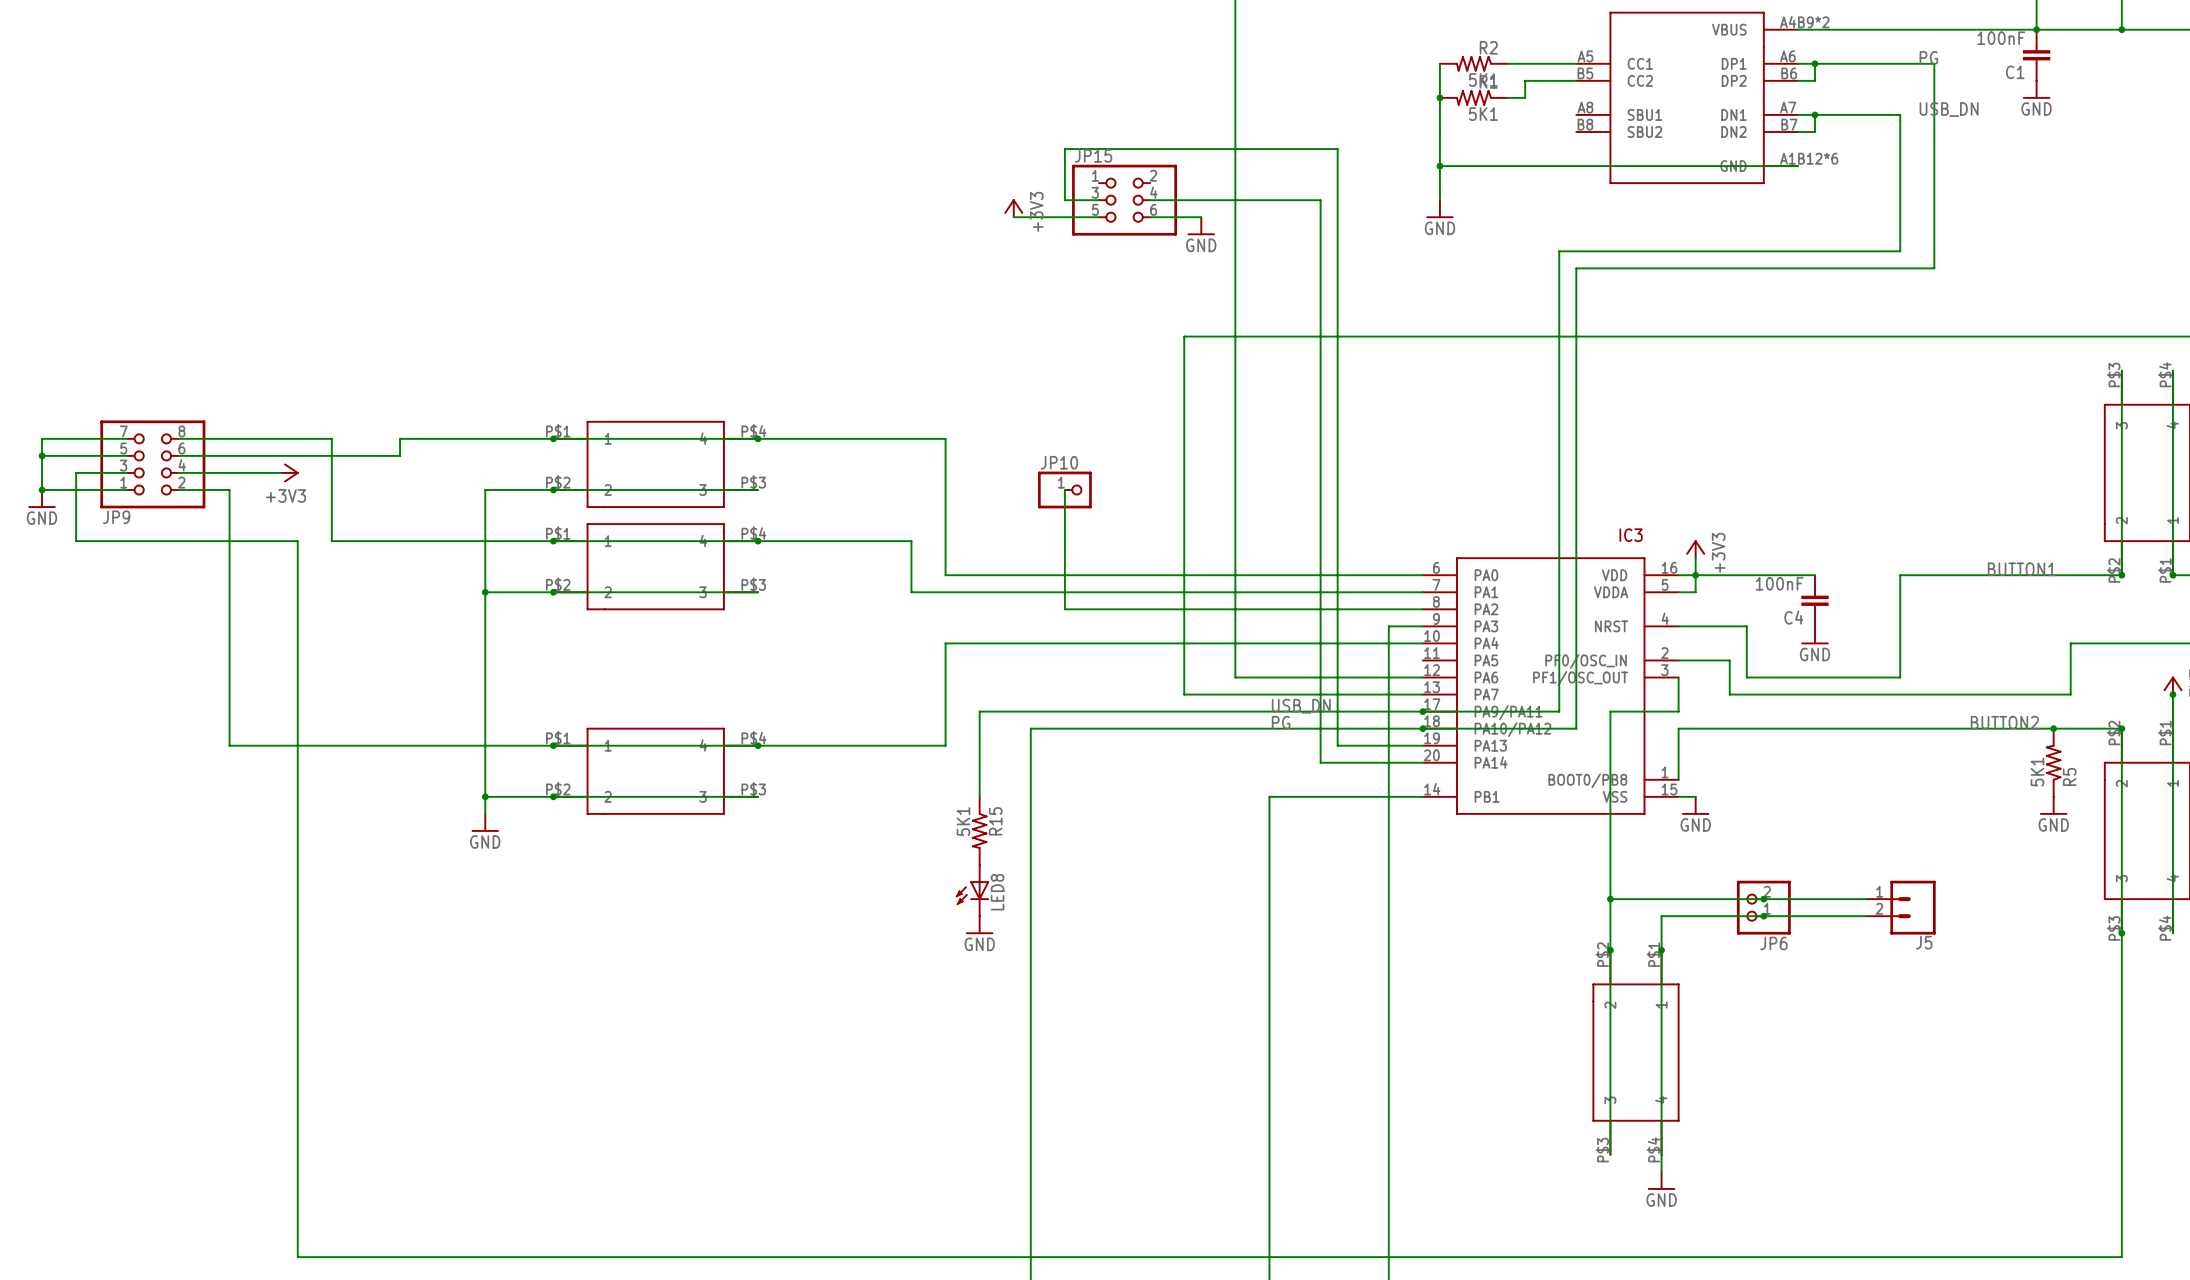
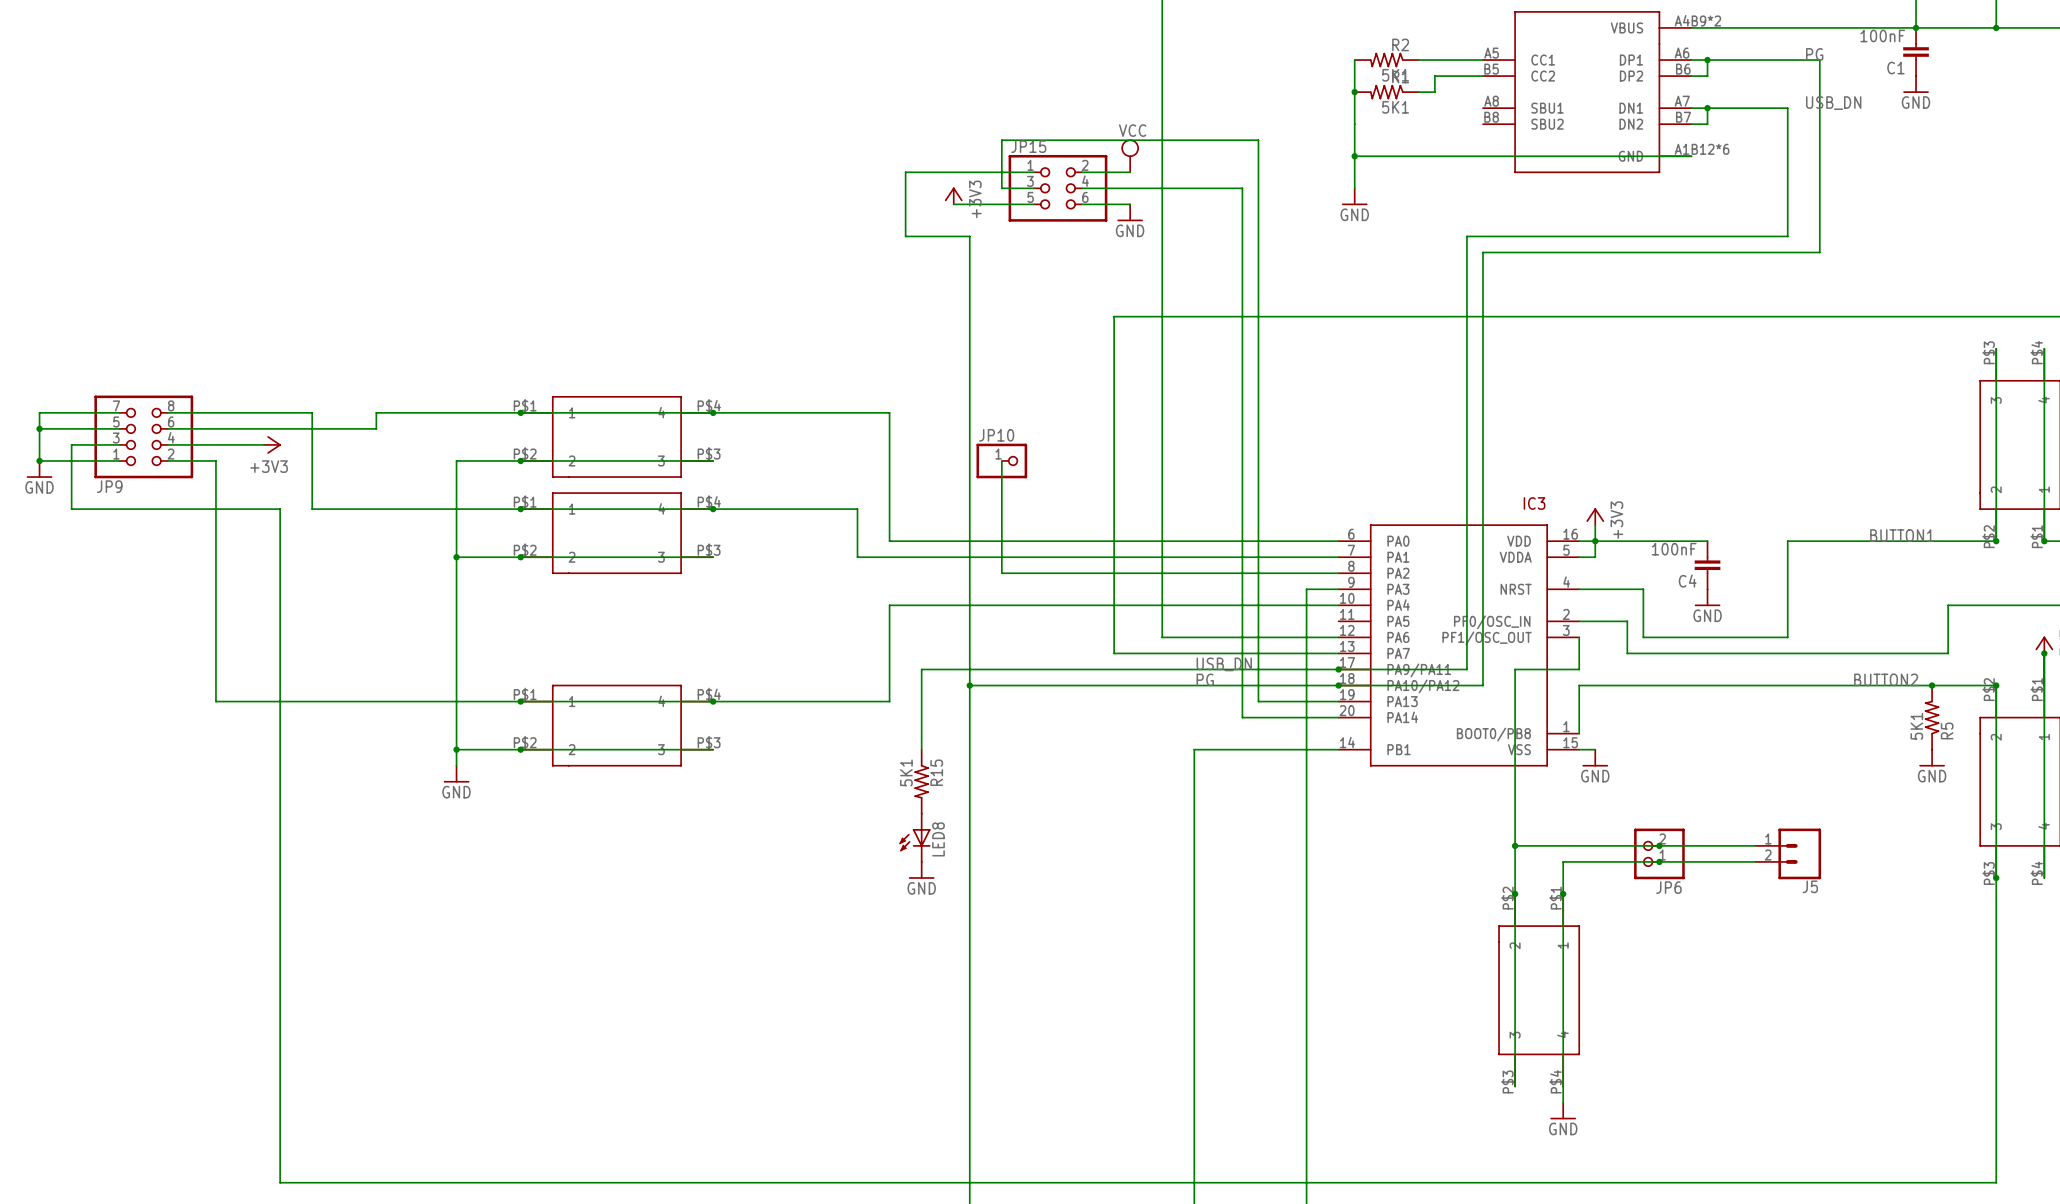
power symbol: none -> VCC (1130, 155)
wire: none -> (1033, 172) (905, 172) (905, 236) (969, 236) (969, 685)
wire: none -> (1082, 172) (1130, 172)
junction: none -> (969, 685)

